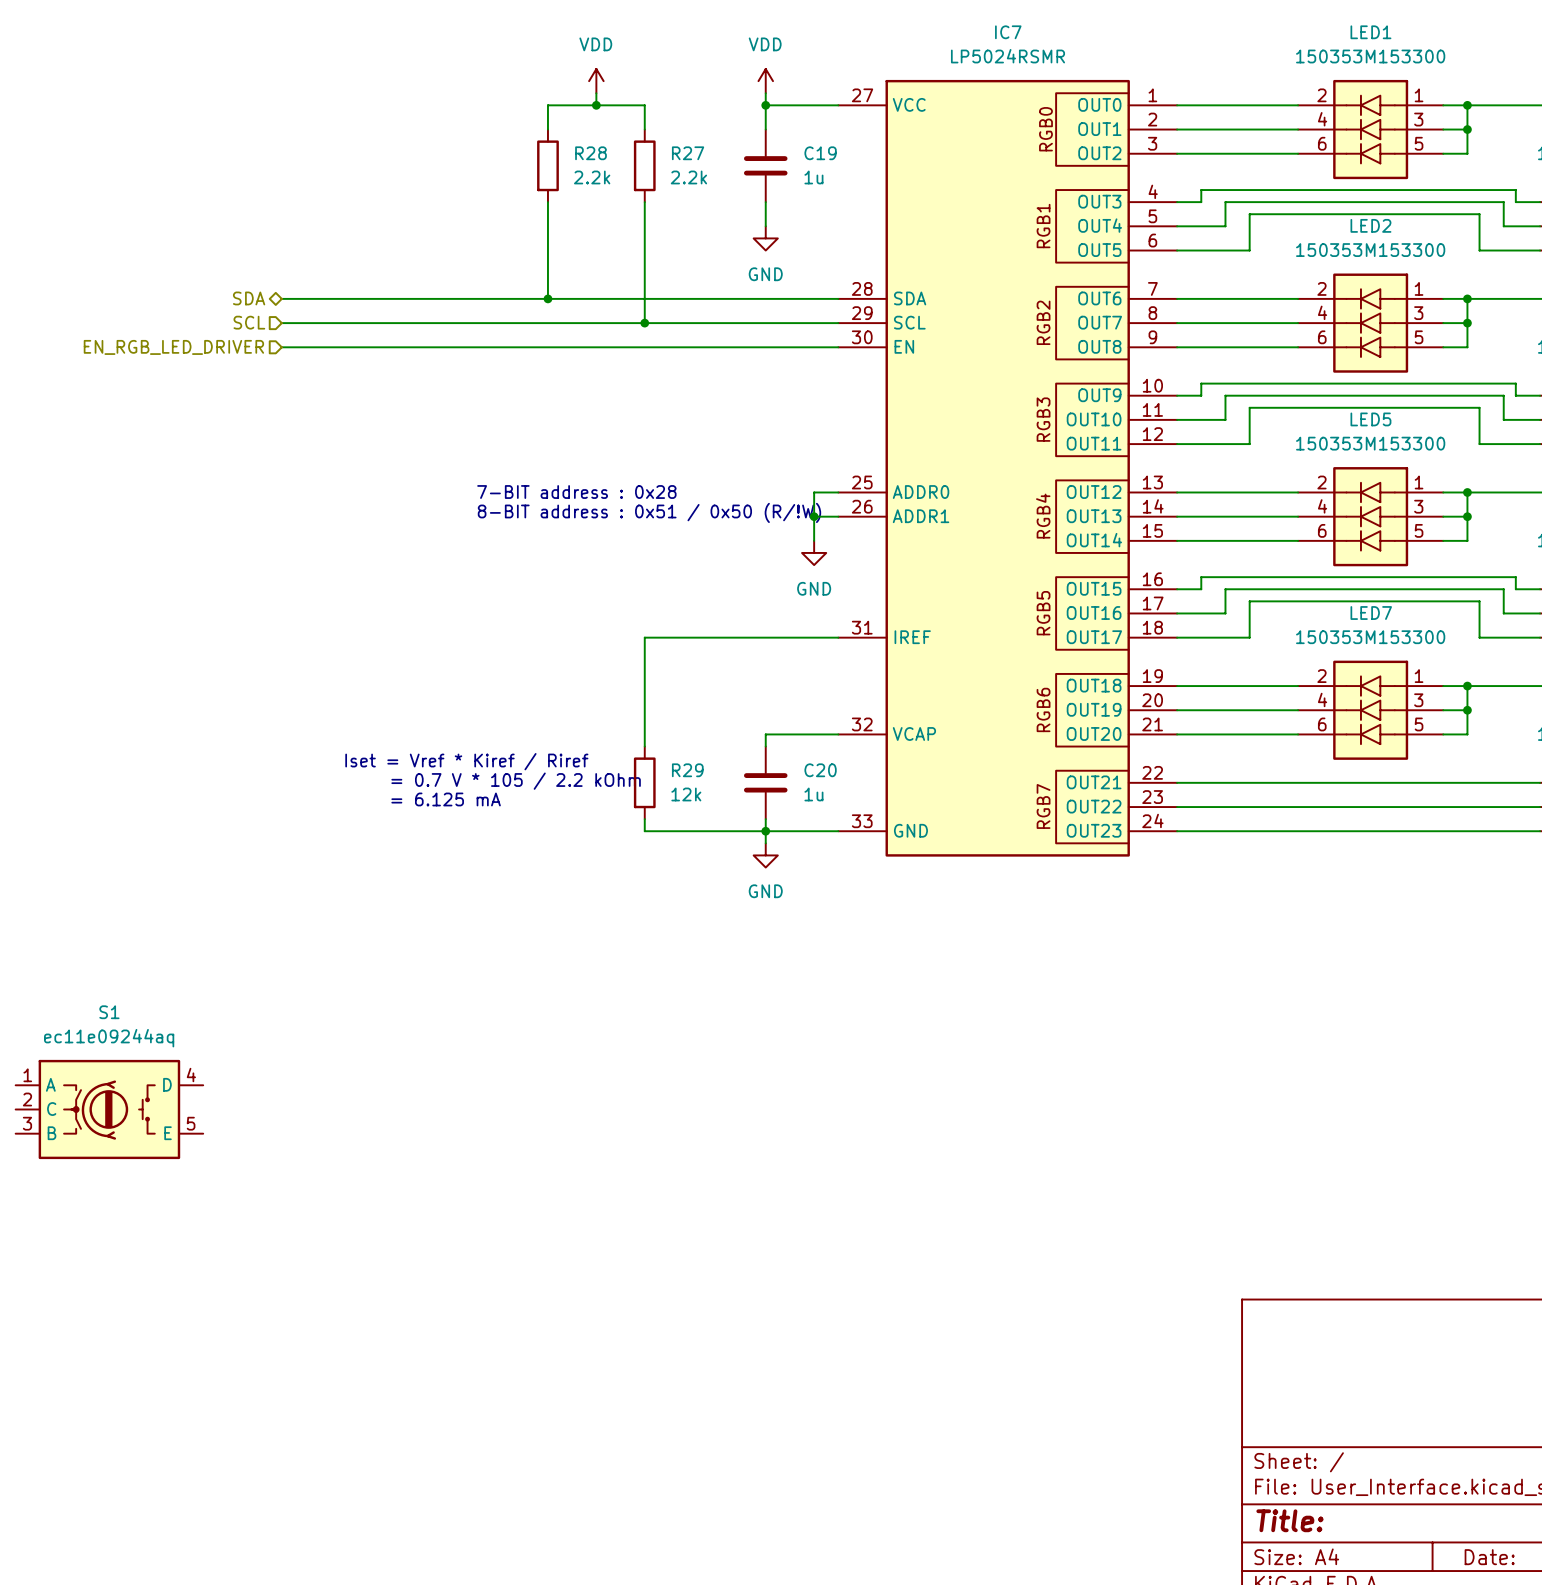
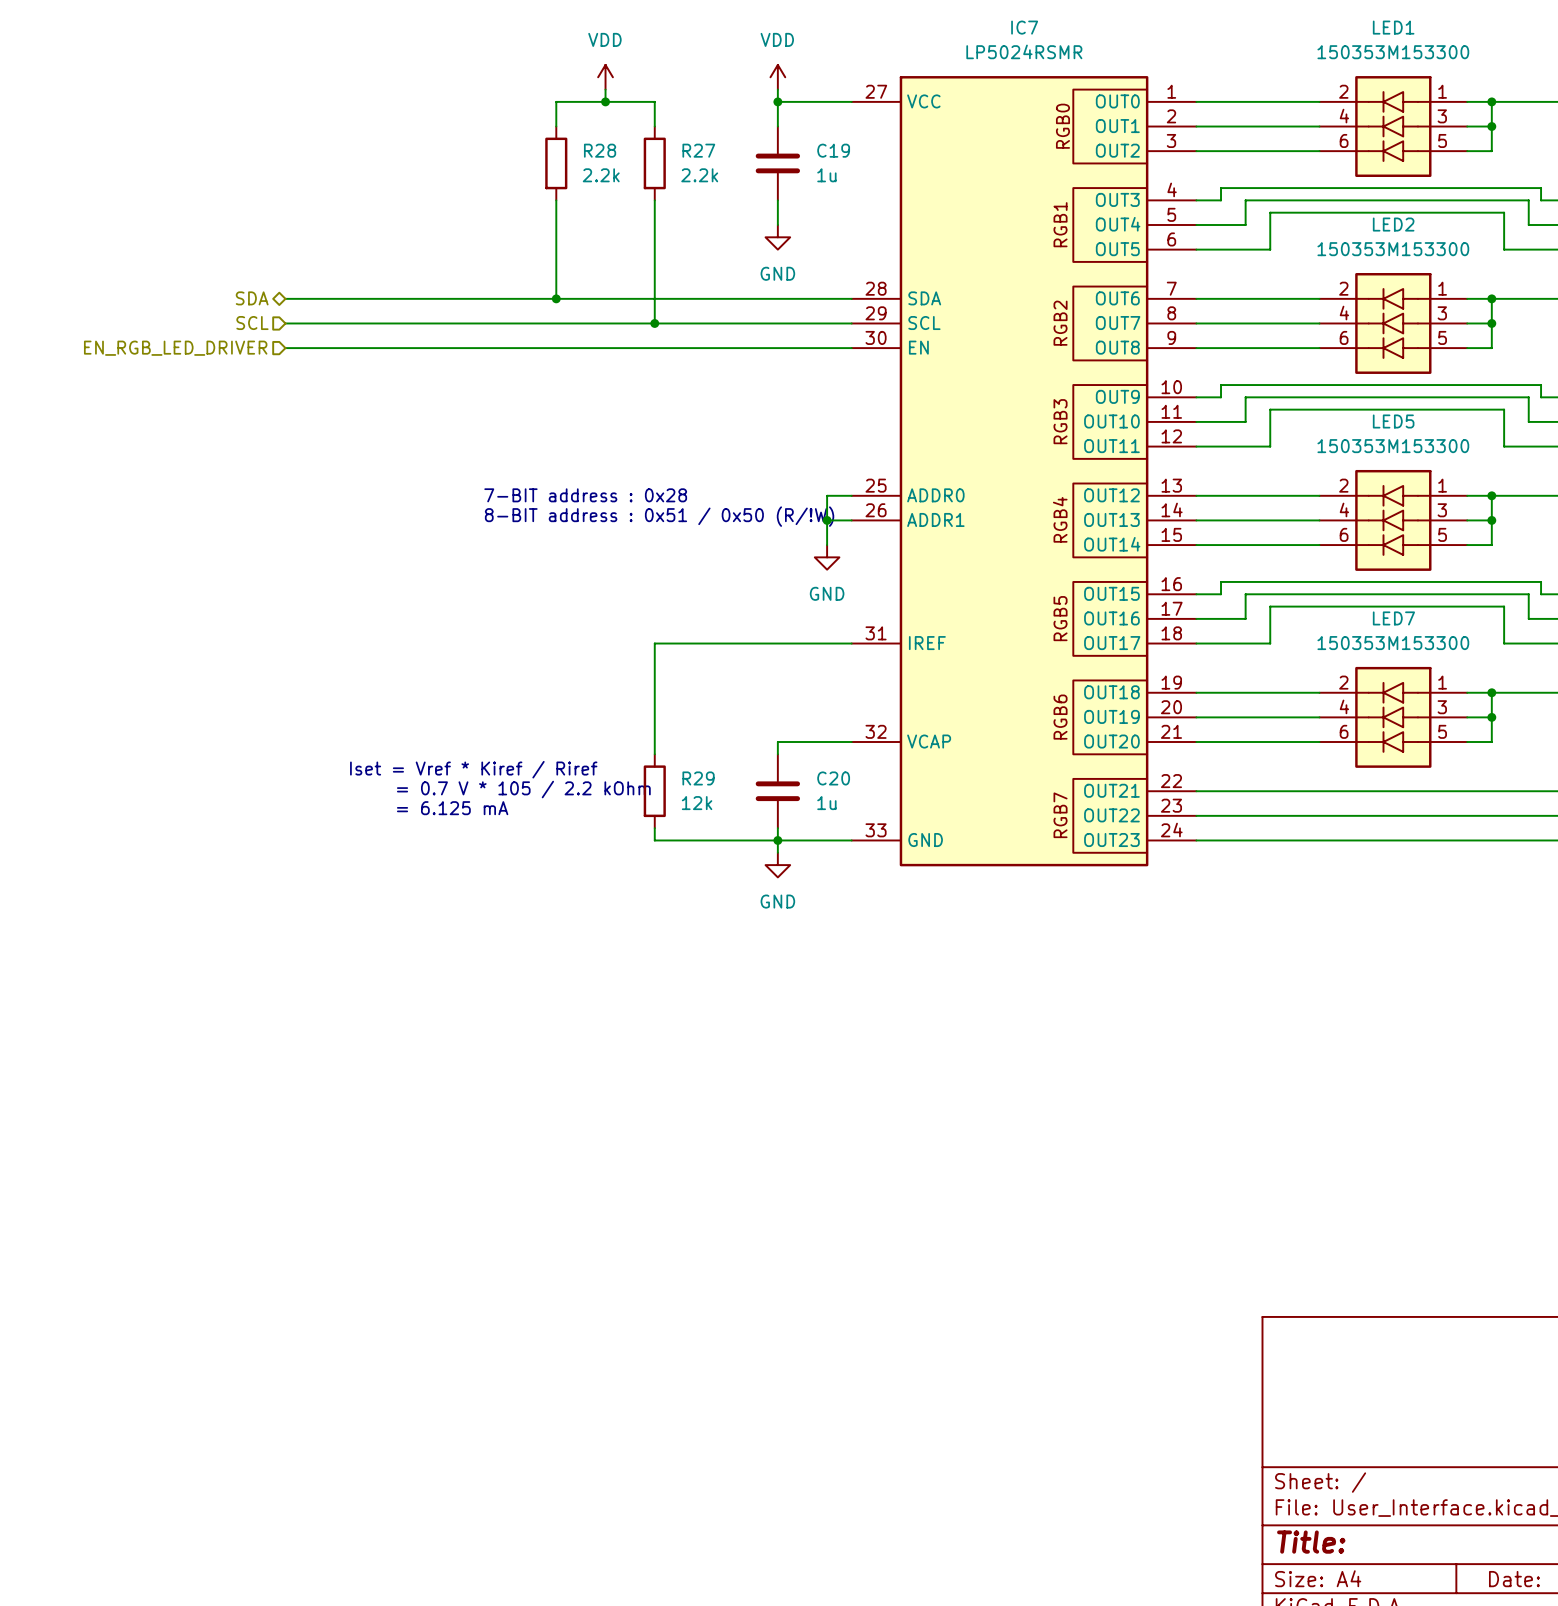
S1: ec11e09244aq (109, 1109) -> none

